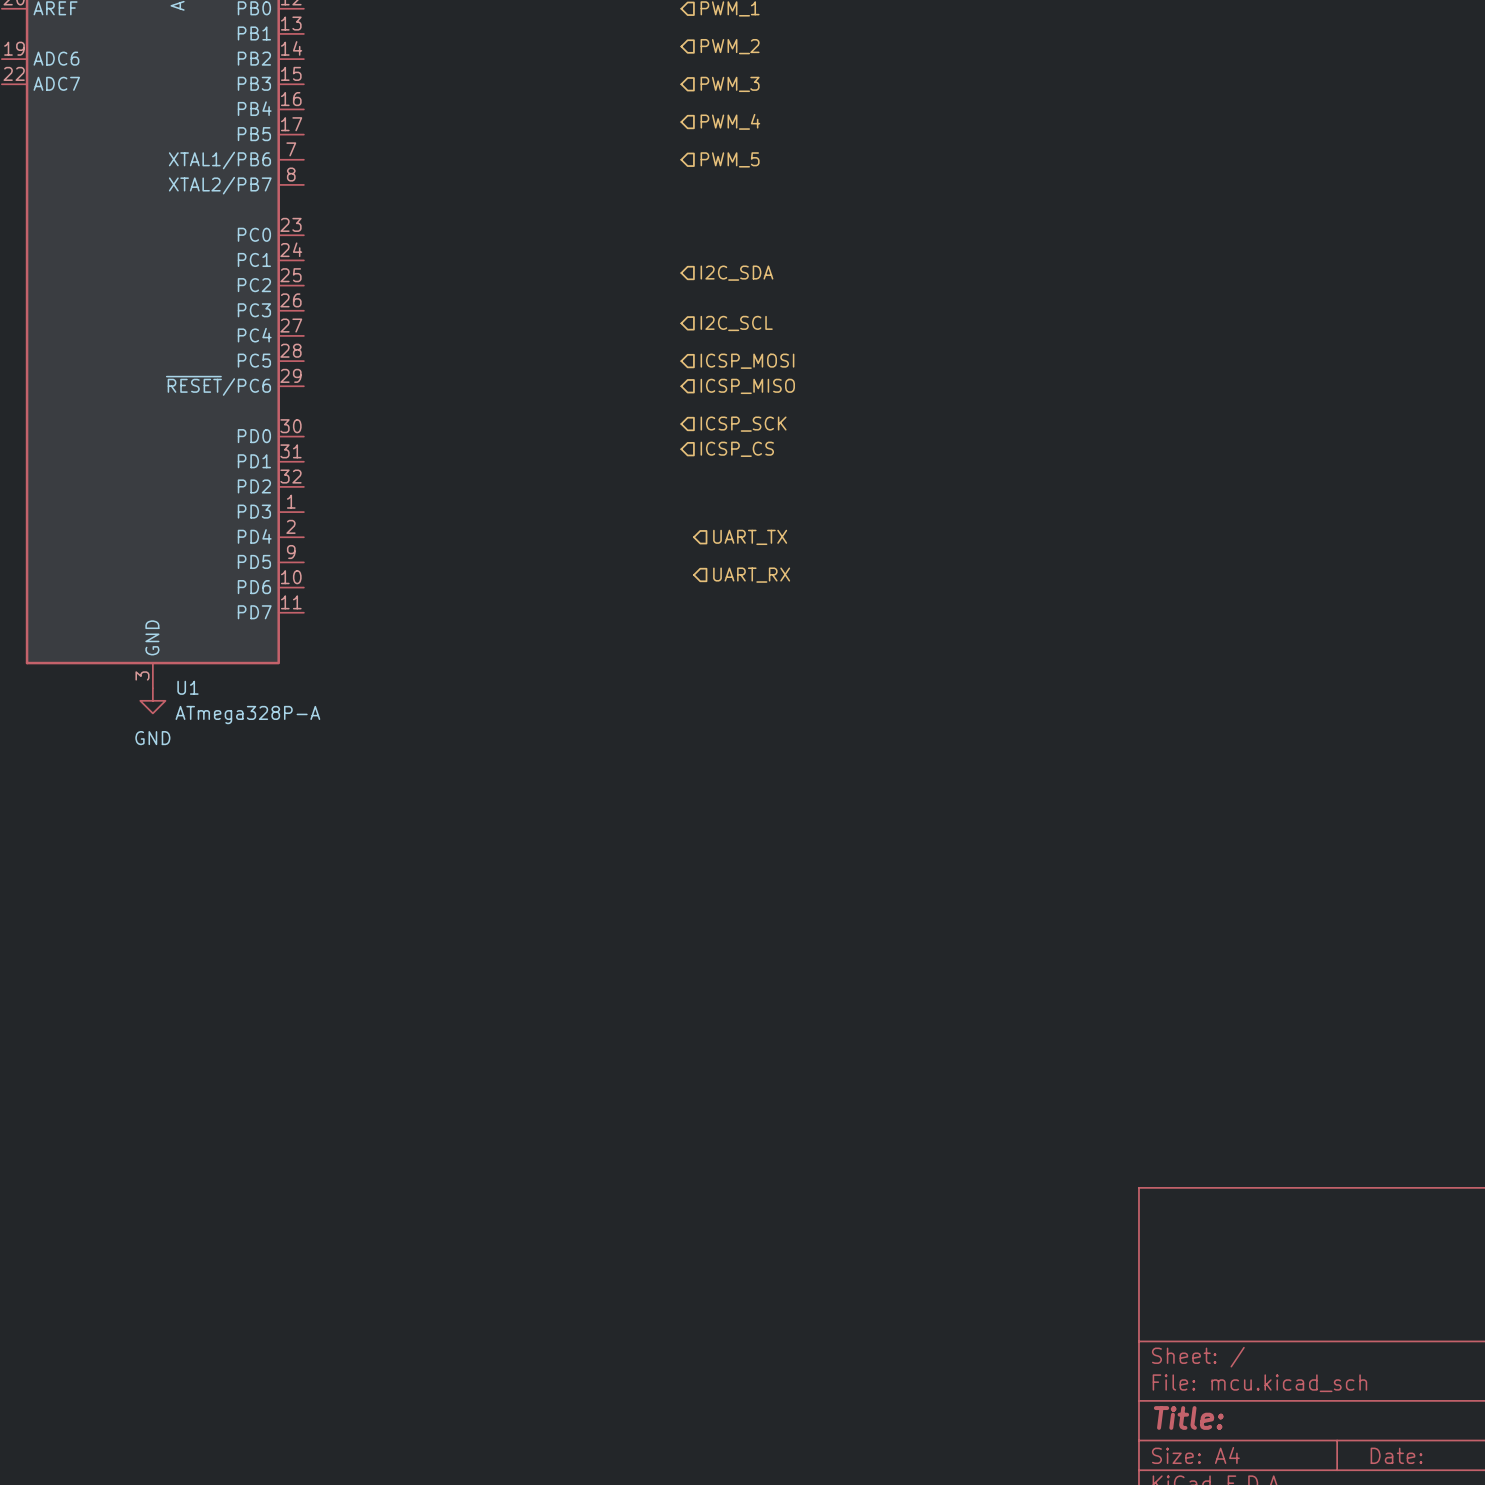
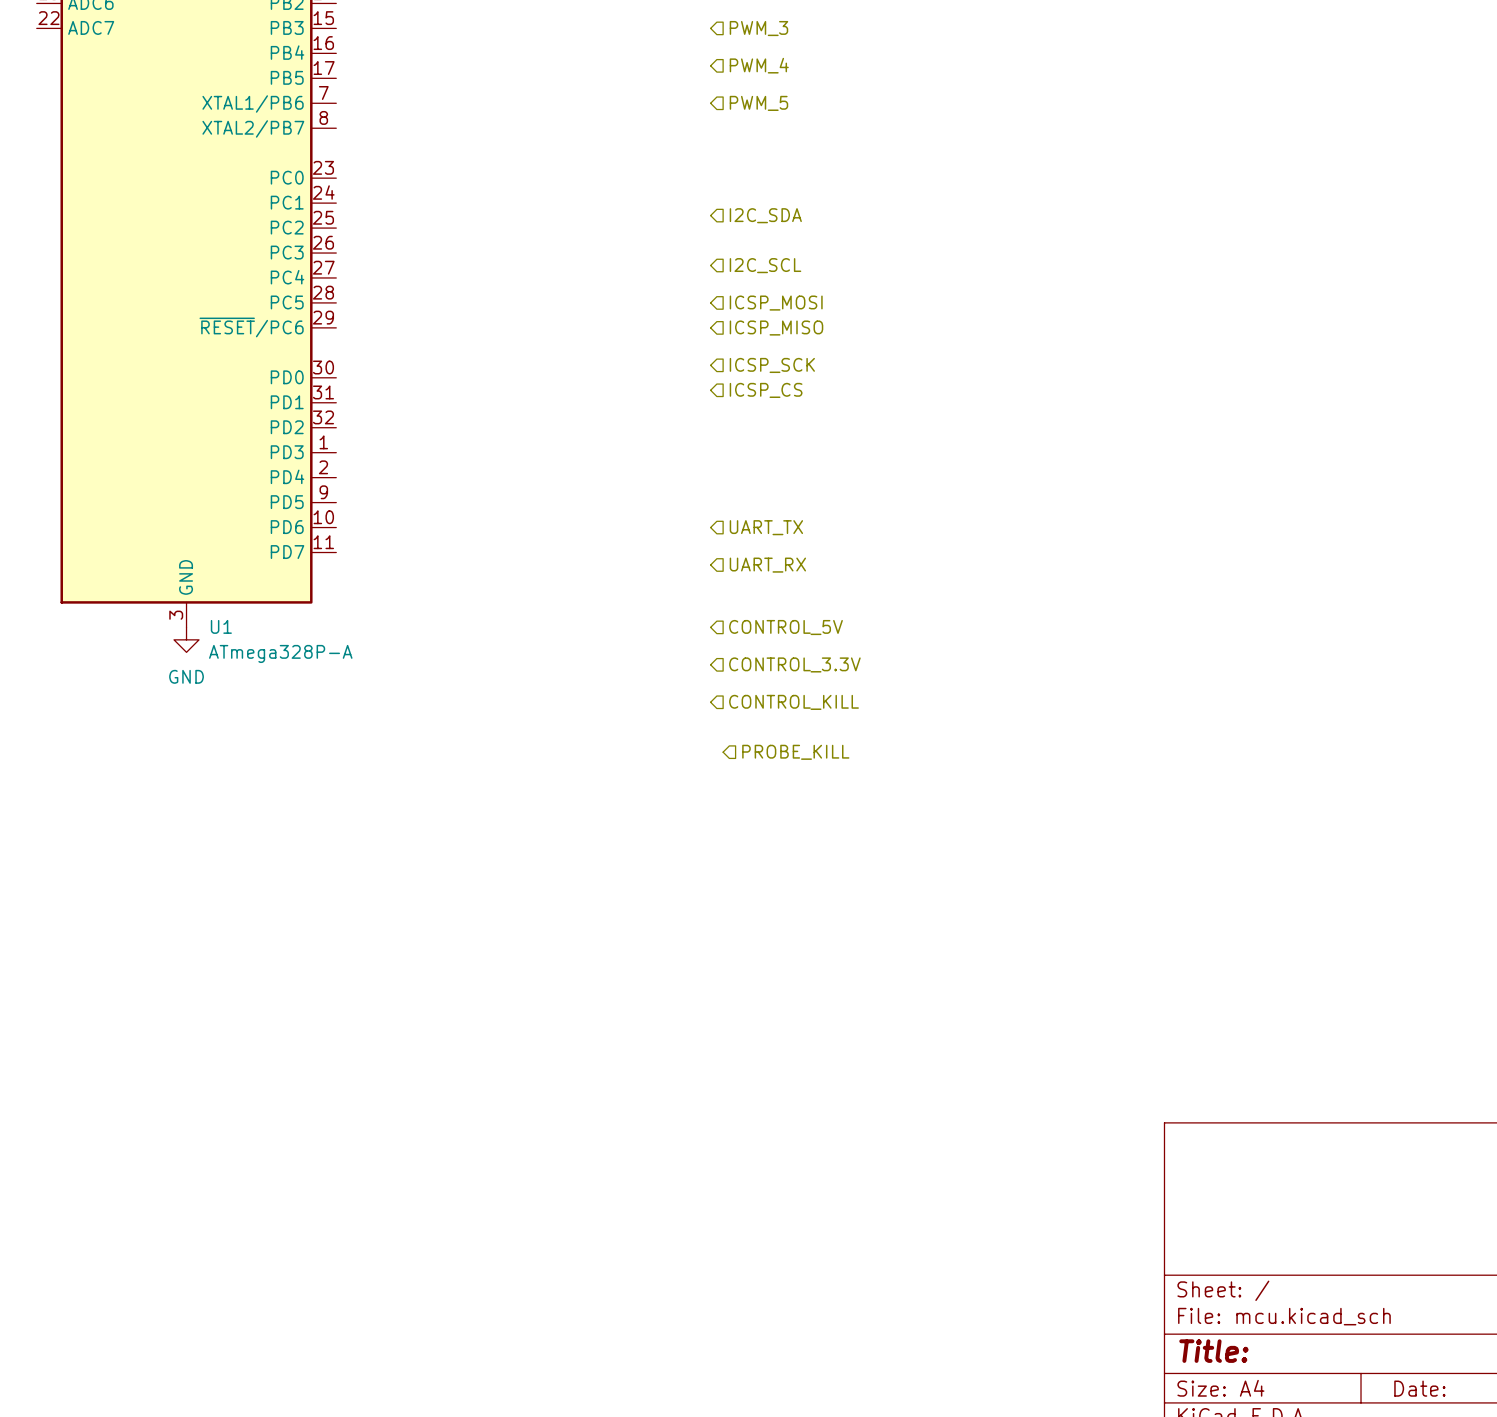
hierarchical label position: UART_TX (750, 537) -> UART_TX (766, 527)
hierarchical label position: UART_RX (751, 575) -> UART_RX (767, 565)
hierarchical label: none -> CONTROL_5V (785, 627)
hierarchical label: none -> CONTROL_3.3V (794, 664)
hierarchical label: none -> CONTROL_KILL (794, 702)
hierarchical label: none -> PROBE_KILL (795, 752)

